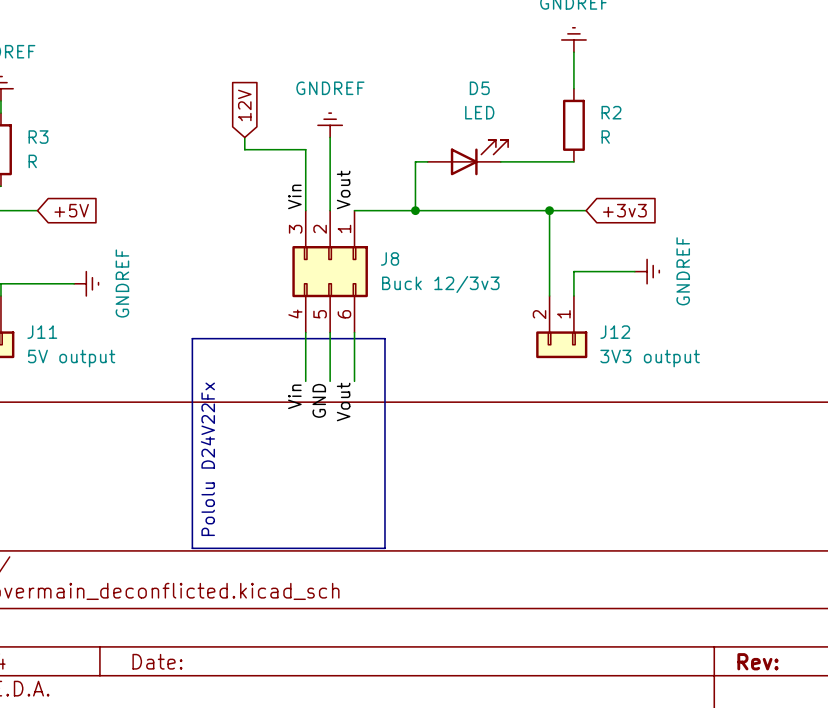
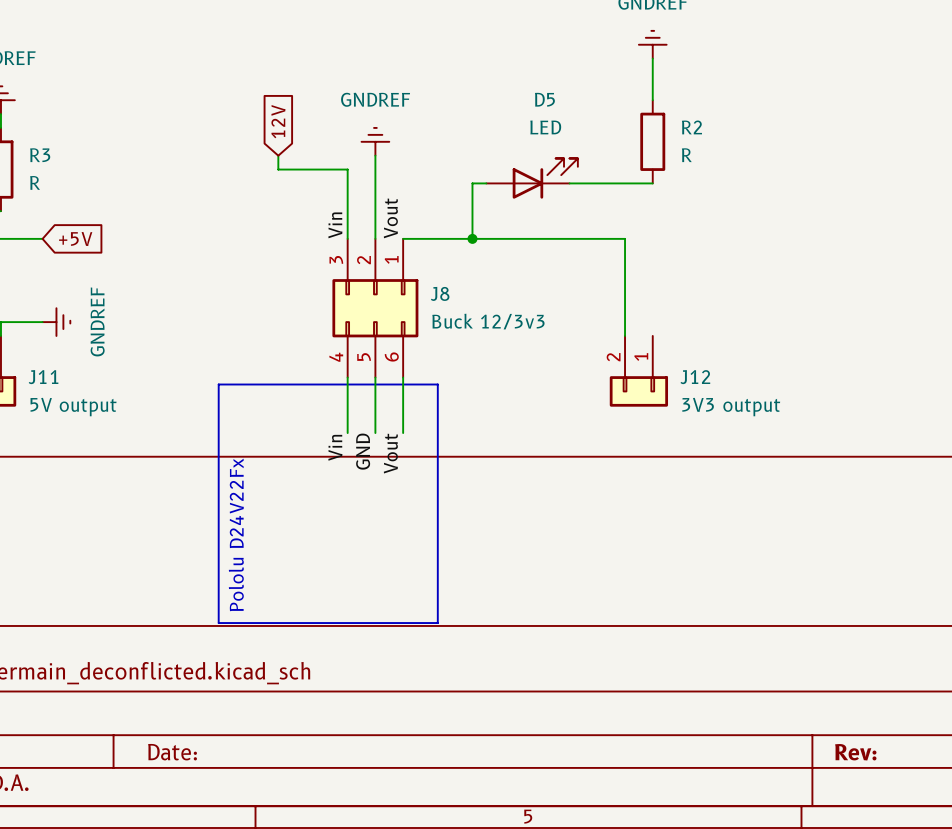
wire: (549, 210) (586, 210) -> none
junction: (549, 210) -> none
global label: +3v3 (624, 210) -> none
wire: (634, 271) (573, 271) (573, 295) -> none
power symbol: GNDREF (647, 271) -> none
wire: (37, 283) (74, 283) -> none
power symbol position: GNDREF (86, 283) -> GNDREF (56, 322)

